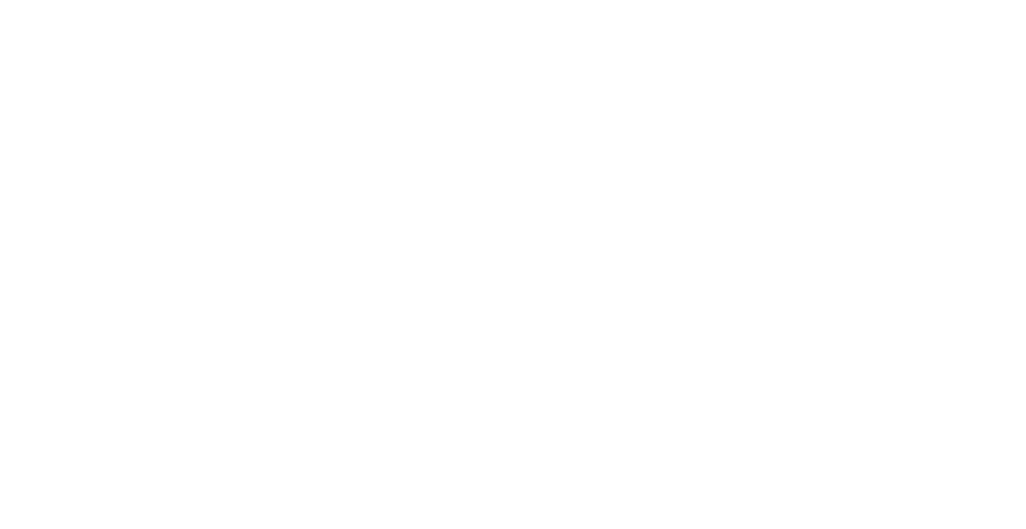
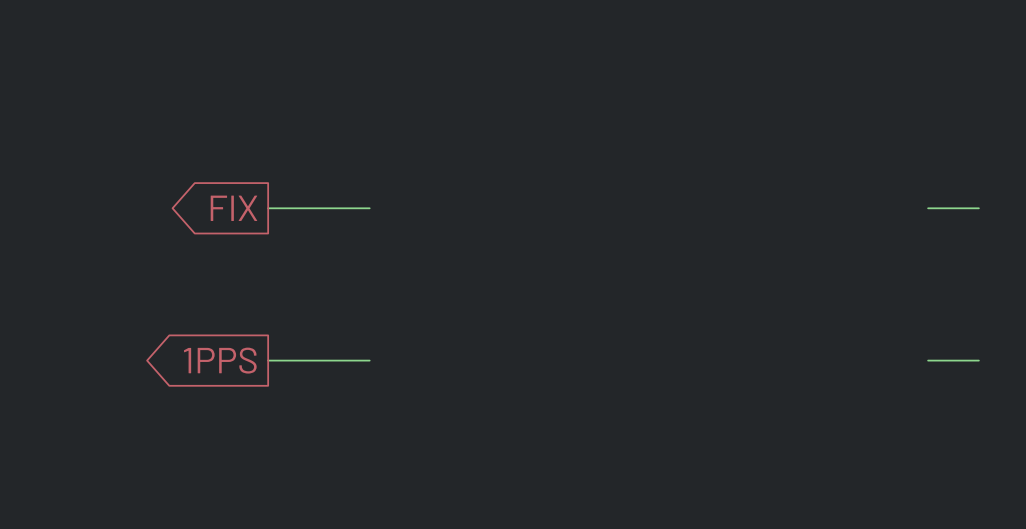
global label: none -> FIX (233, 208)
wire: none -> (268, 208) (369, 208)
wire: none -> (928, 208) (978, 208)
global label: none -> 1PPS (220, 360)
wire: none -> (268, 360) (369, 360)
wire: none -> (928, 360) (978, 360)

